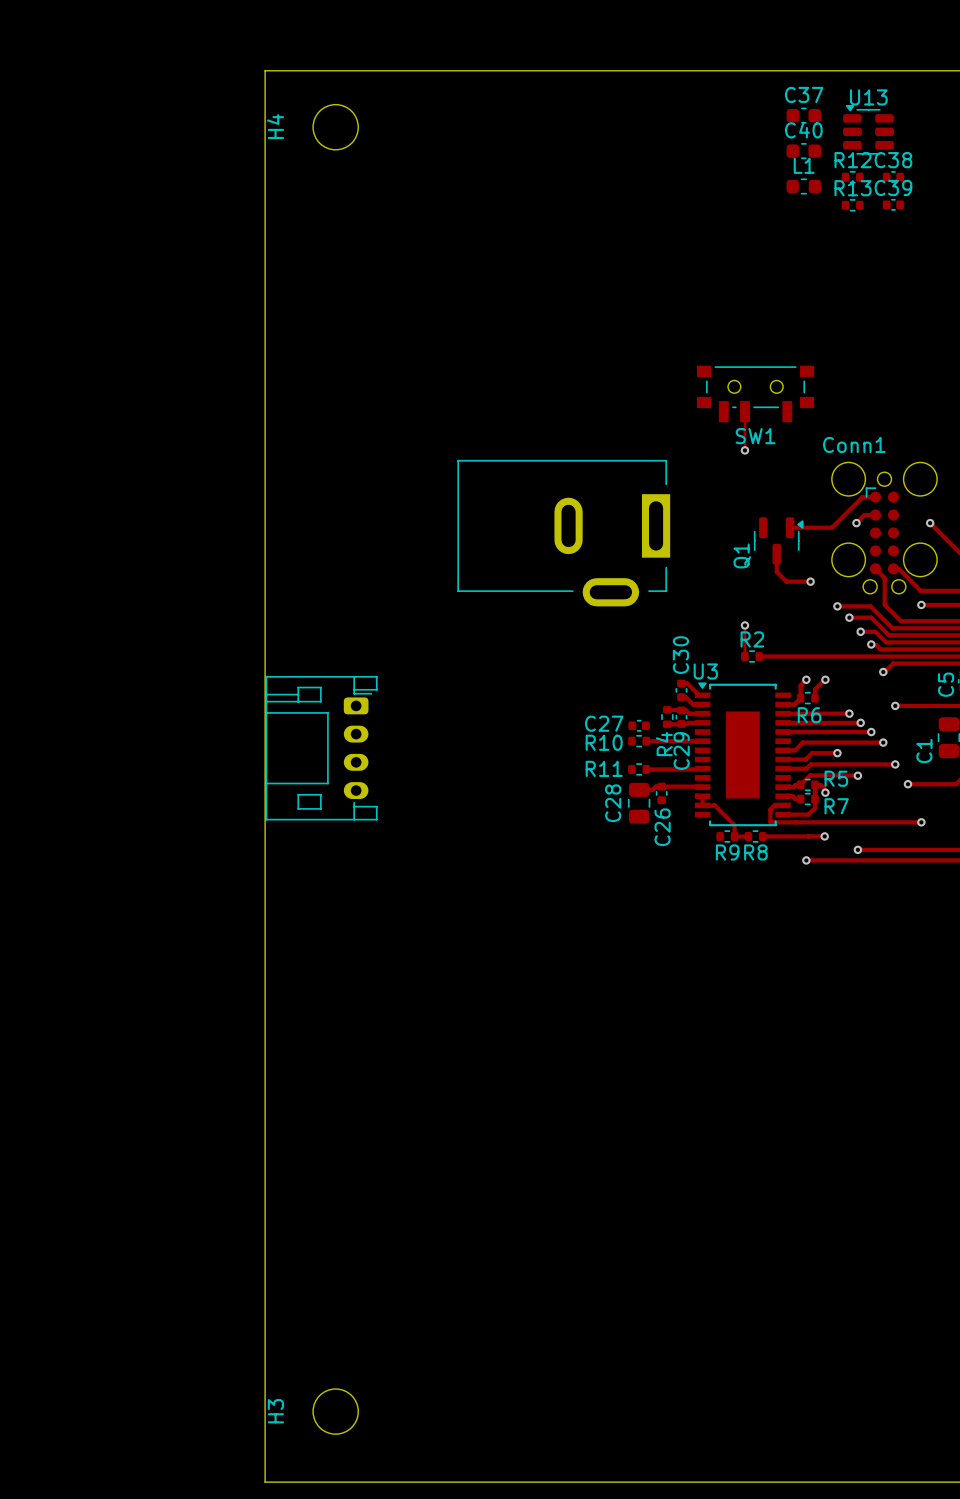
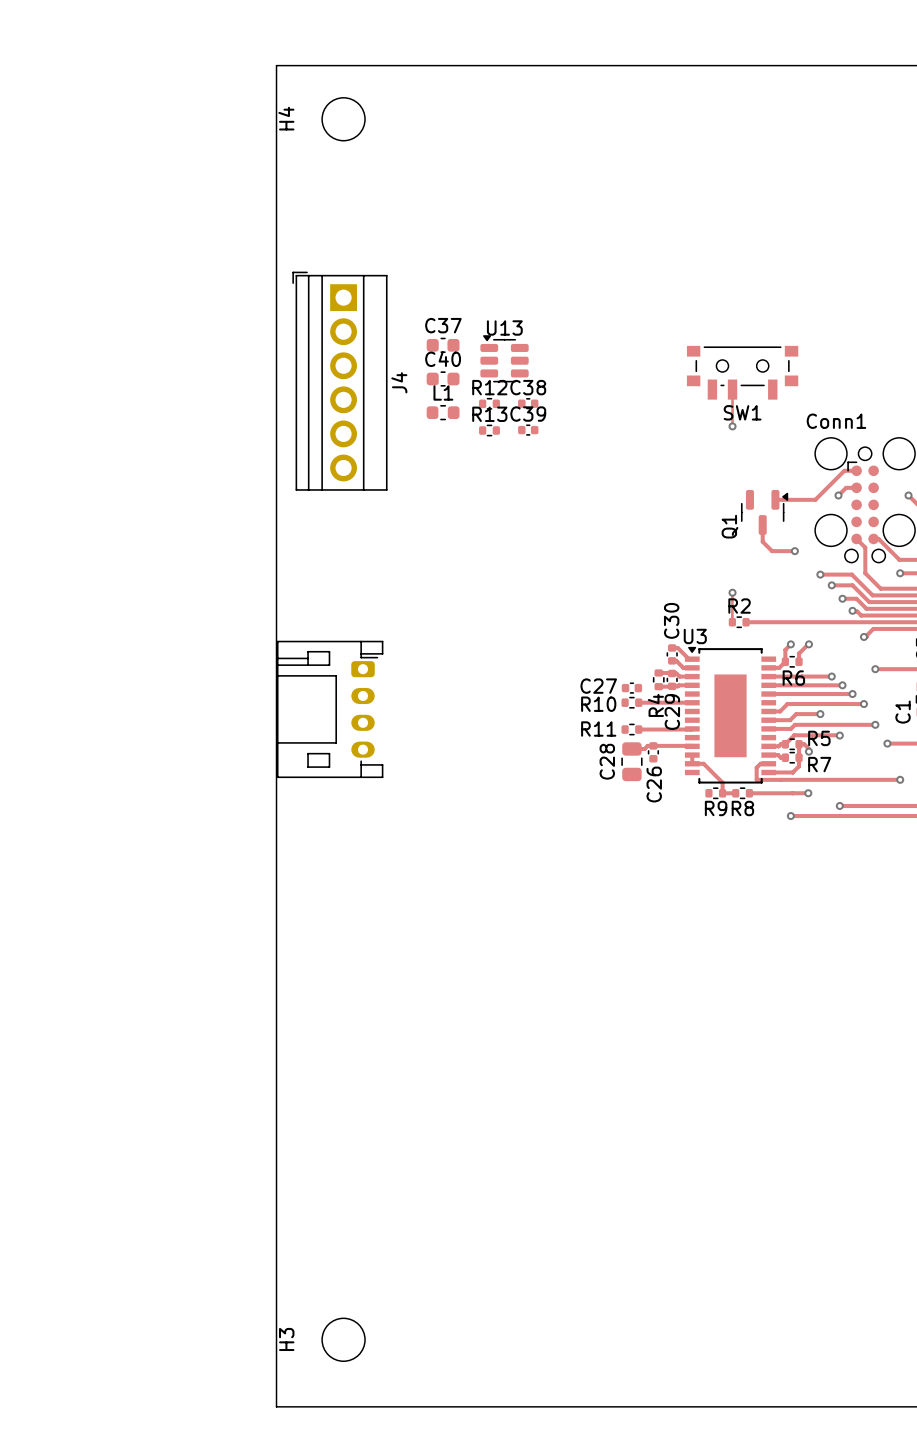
C37 position: (803, 115) -> (443, 345)
U13 position: (868, 129) -> (504, 358)
C40 position: (803, 151) -> (443, 378)
R12 position: (852, 177) -> (489, 403)
C38 position: (893, 177) -> (528, 403)
L1 position: (803, 186) -> (443, 412)
C39 position: (893, 204) -> (528, 430)
R13 position: (852, 205) -> (489, 430)
J4: none -> (339, 381)
part: (563, 533) -> none

